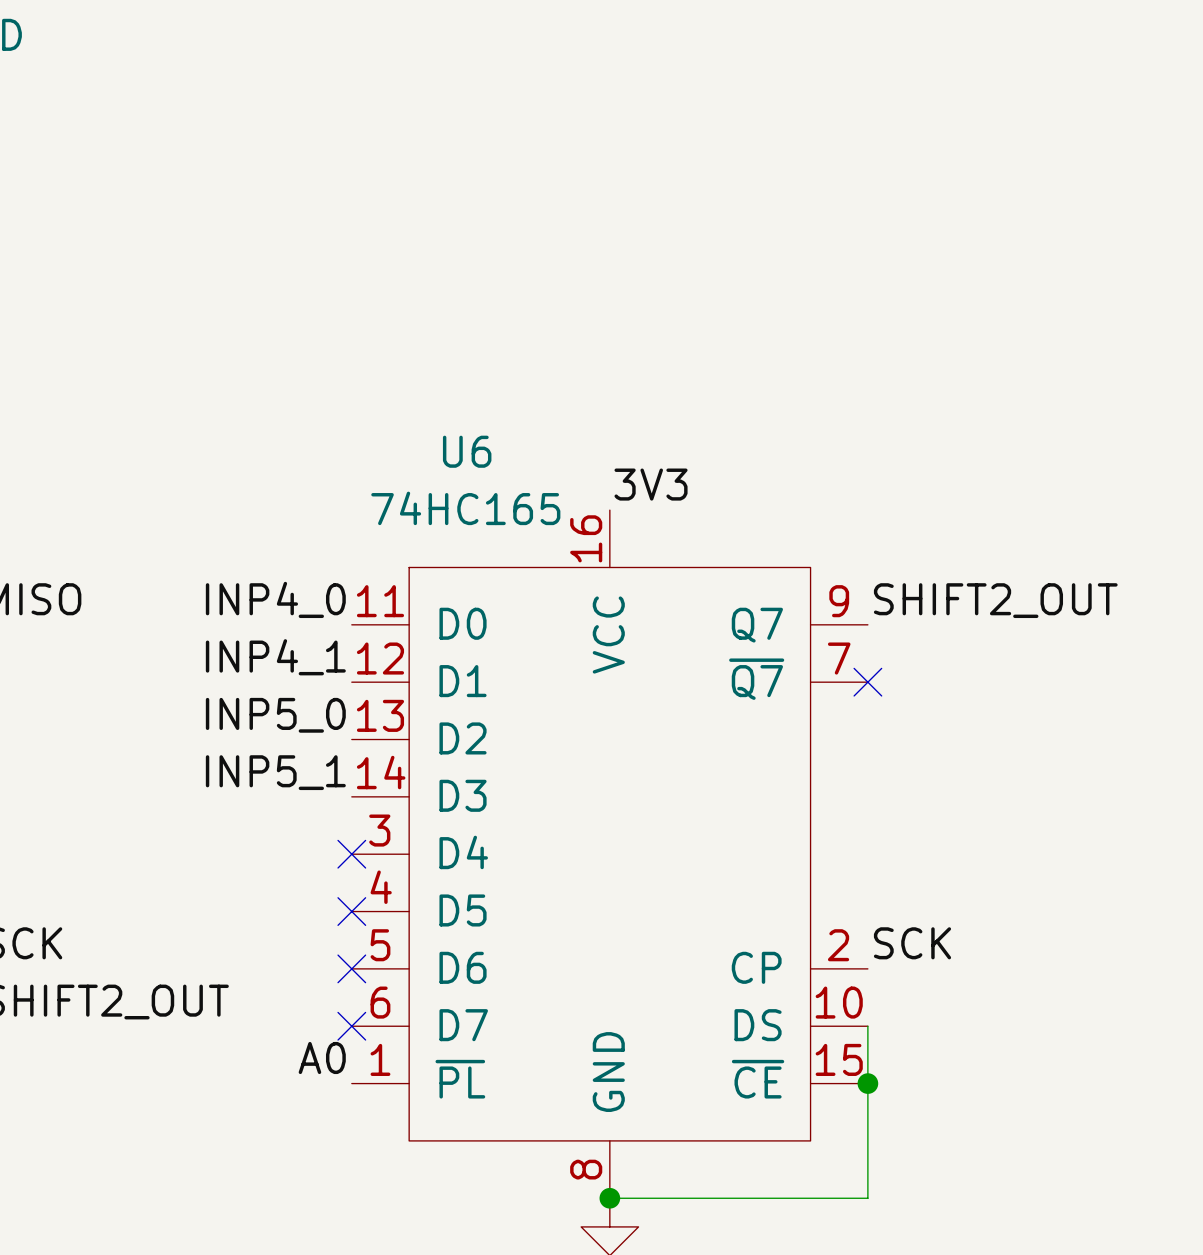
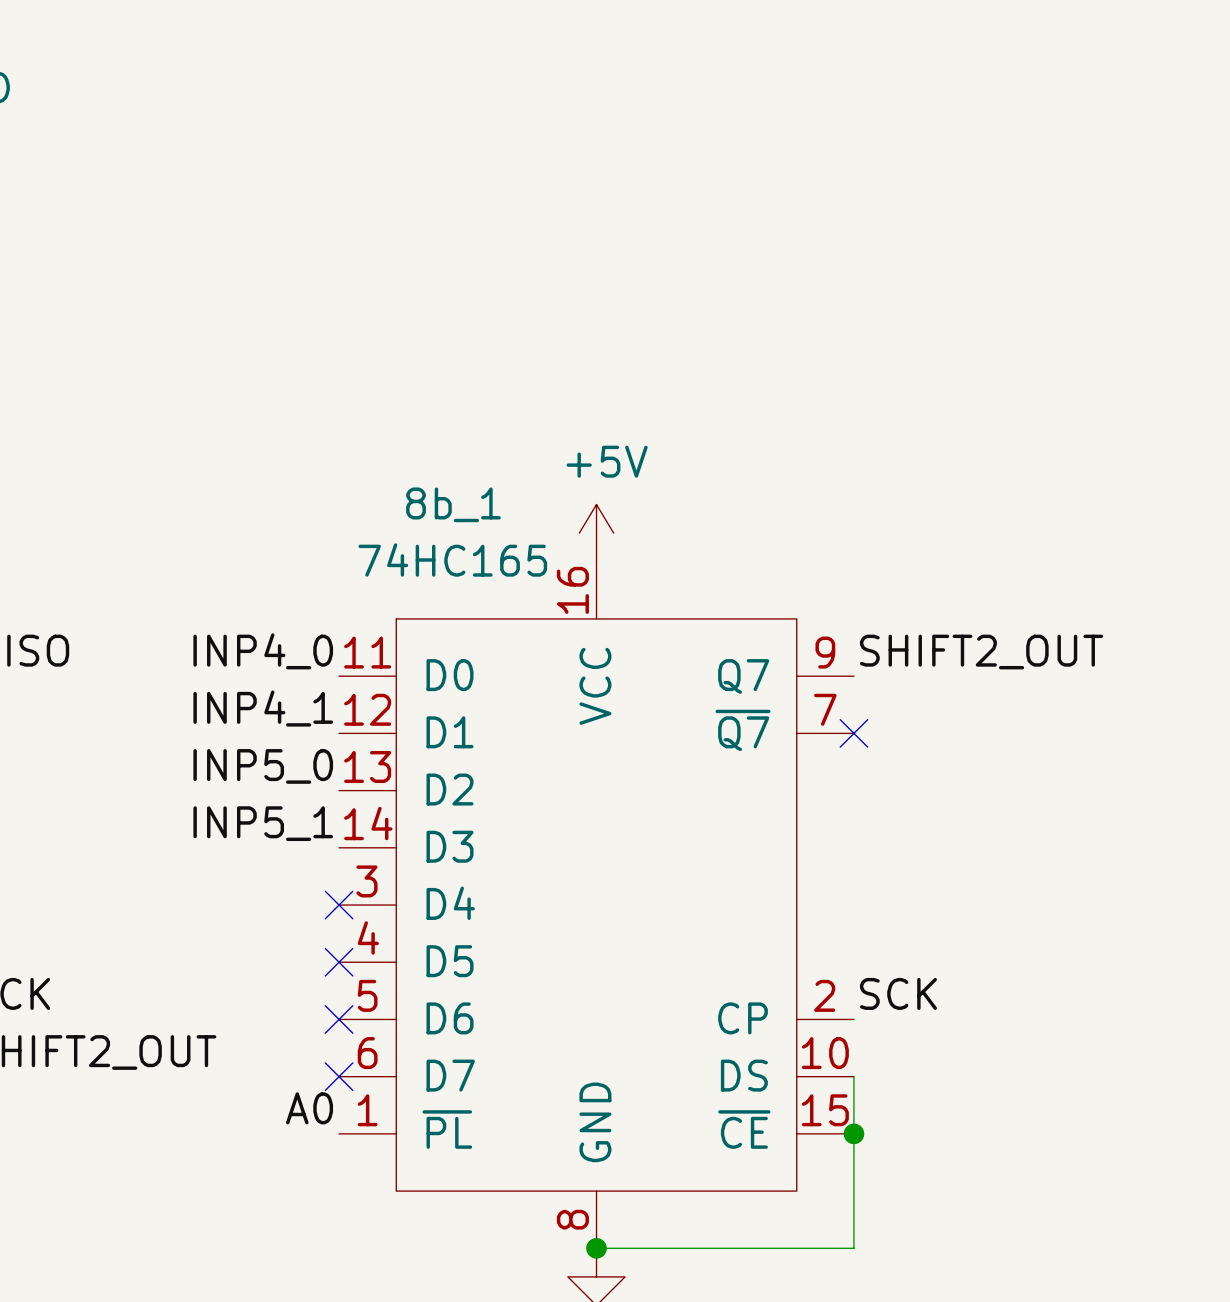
U6 name: U6 (467, 451) -> 8b_1 (453, 504)
power symbol: none -> +5V (596, 533)
label: 3V3 (651, 484) -> none

